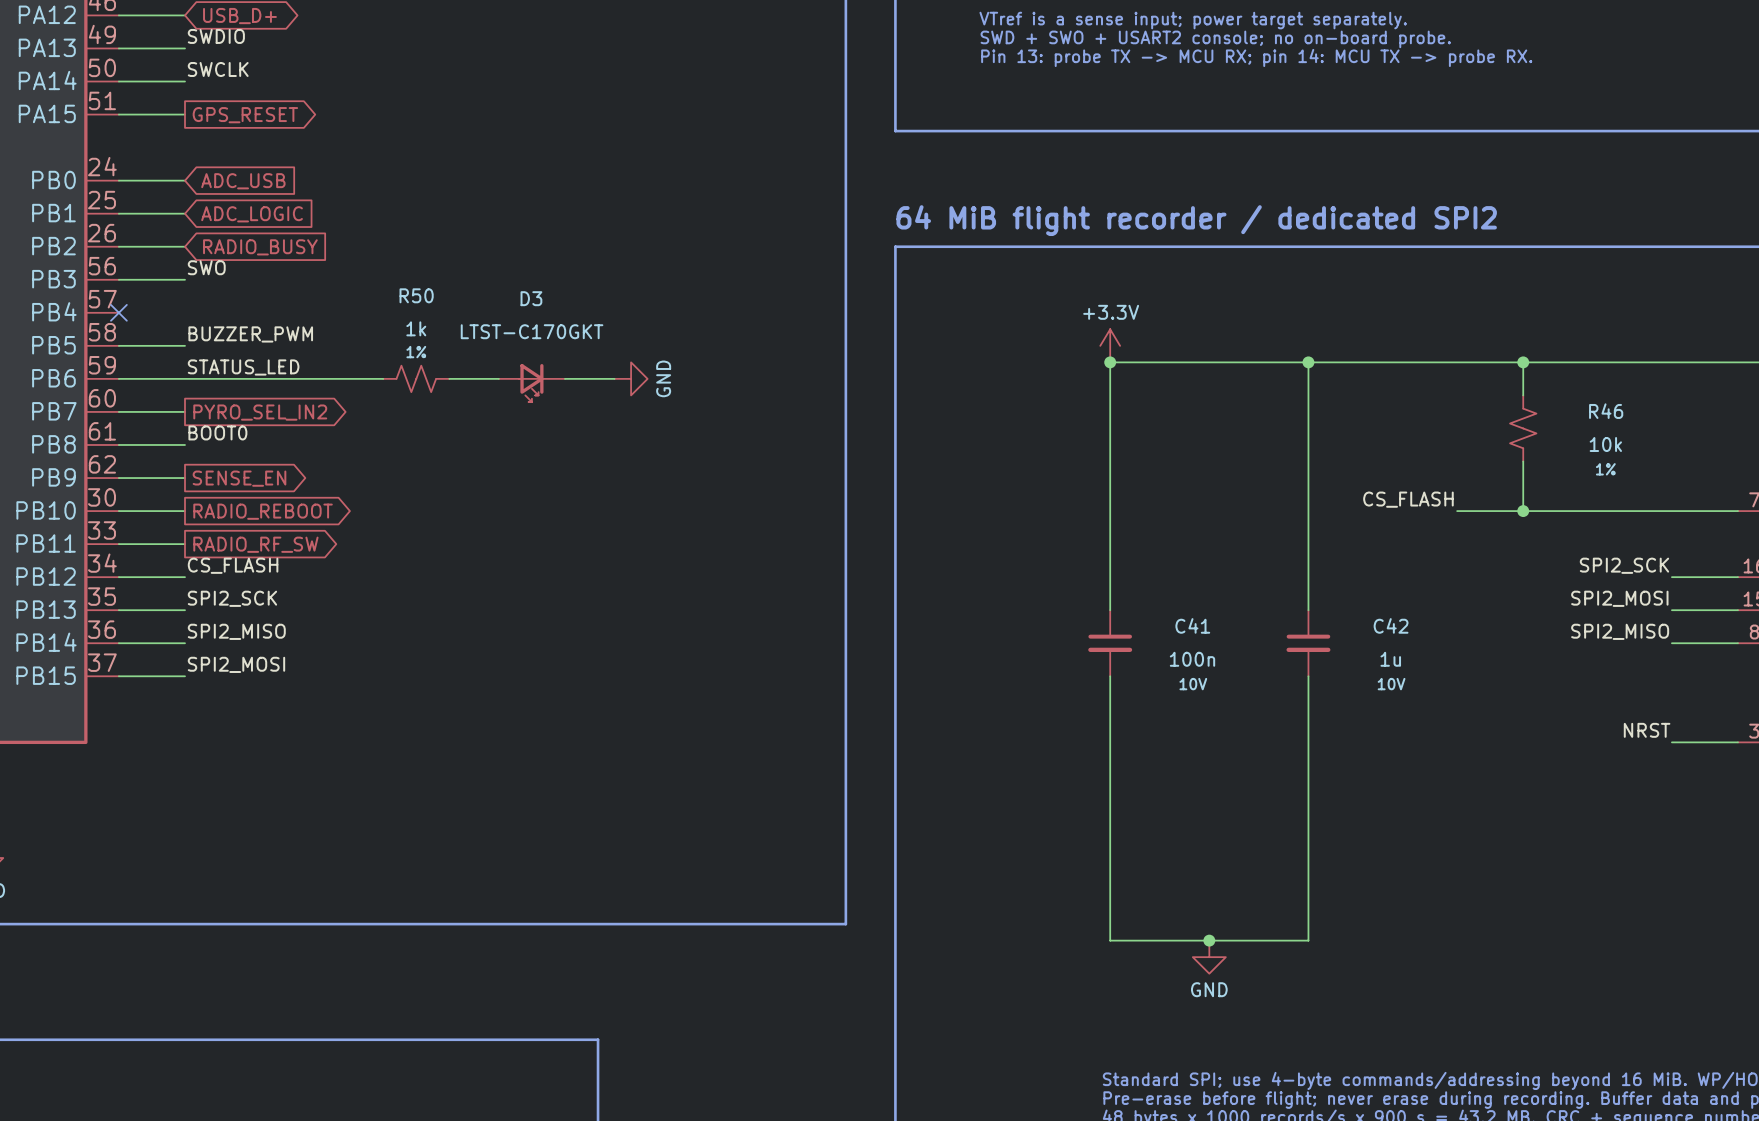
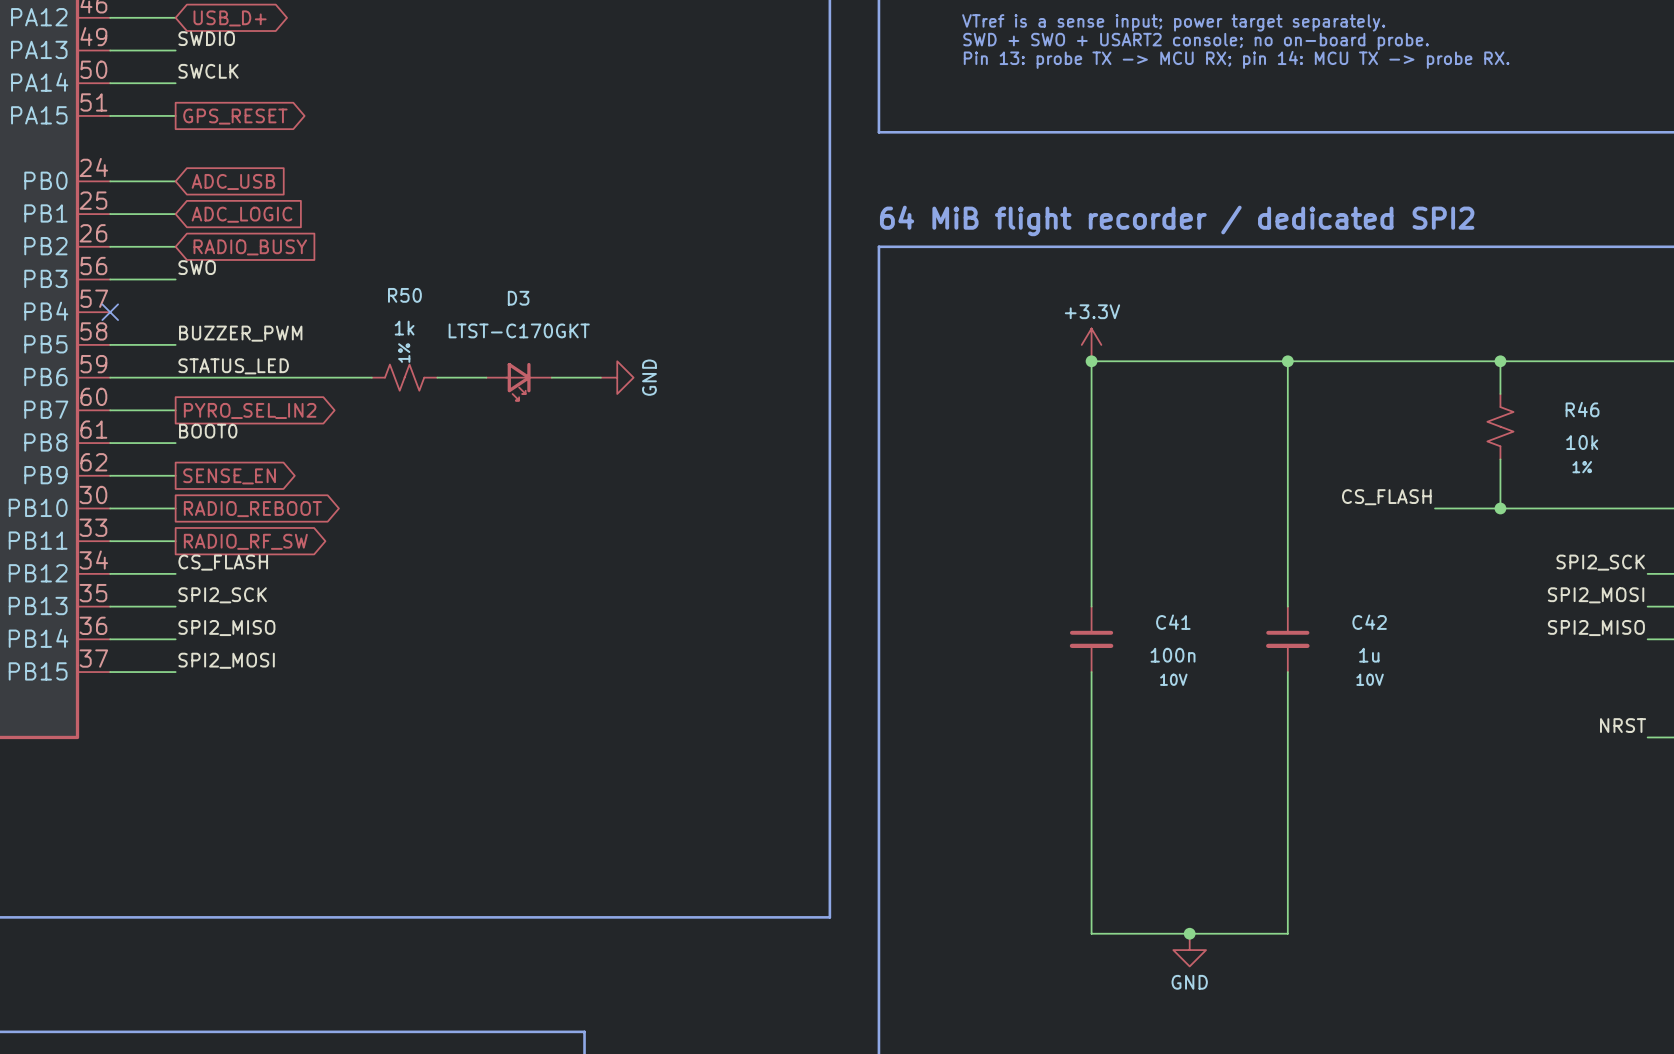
R50 text rotation: 0° (416, 352) -> 90° counterclockwise (404, 353)

